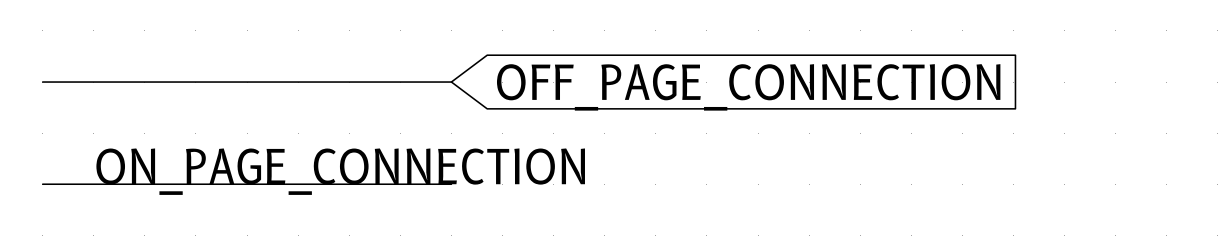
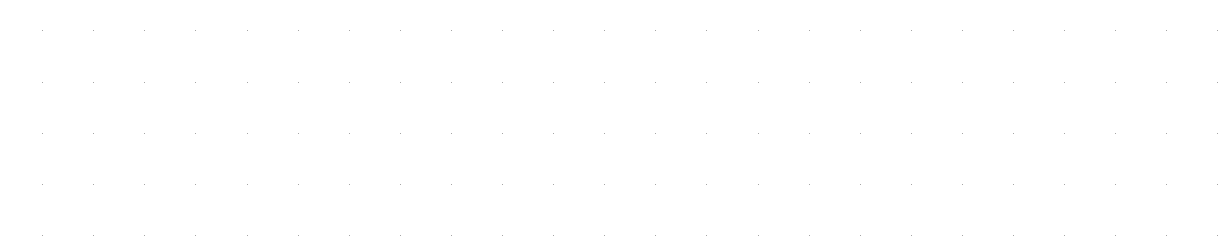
wire: (42, 82) (451, 82) -> none
global label: OFF_PAGE_CONNECTION (748, 87) -> none
label: ON_PAGE_CONNECTION (340, 171) -> none
wire: (42, 184) (451, 184) -> none

